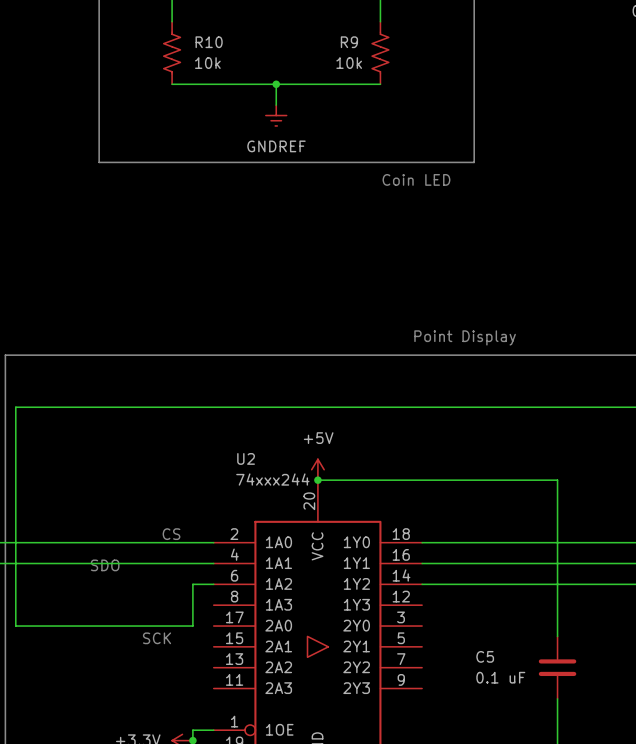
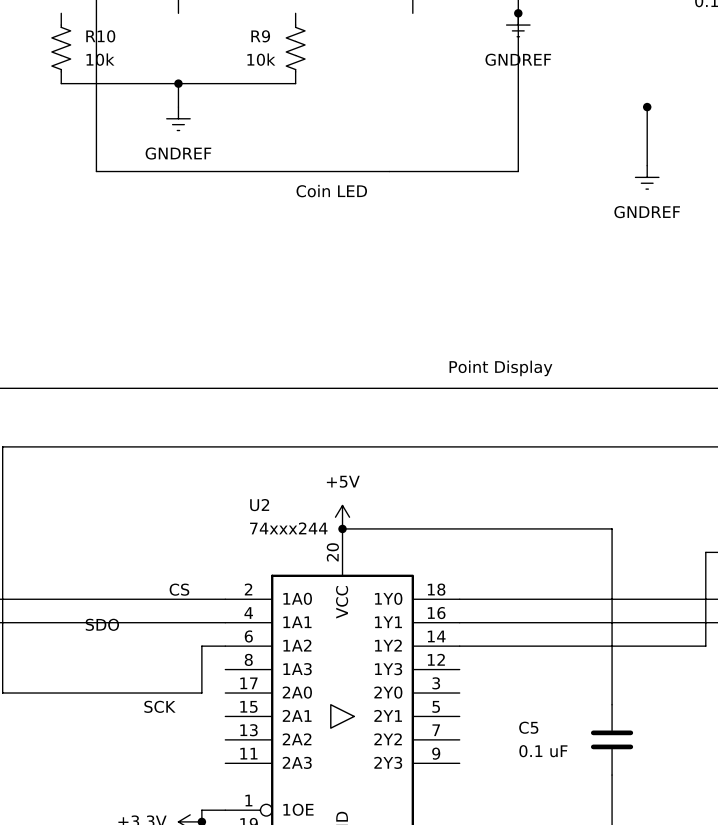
junction: none -> (518, 13)
power symbol: none -> GNDREF (518, 25)
R10 position: (172, 53) -> (61, 48)
R9 position: (380, 53) -> (295, 48)
wire: none -> (61, 83) (178, 83) (178, 107)
junction: none -> (178, 83)
junction: (276, 84) -> none
wire: (380, 84) (276, 84) (276, 105) -> none
wire: none -> (647, 107) (647, 165)
junction: none -> (647, 107)
power symbol position: GNDREF (276, 115) -> GNDREF (178, 118)
power symbol: none -> GNDREF (647, 177)
text position: Coin LED (416, 179) -> Coin LED (331, 191)

